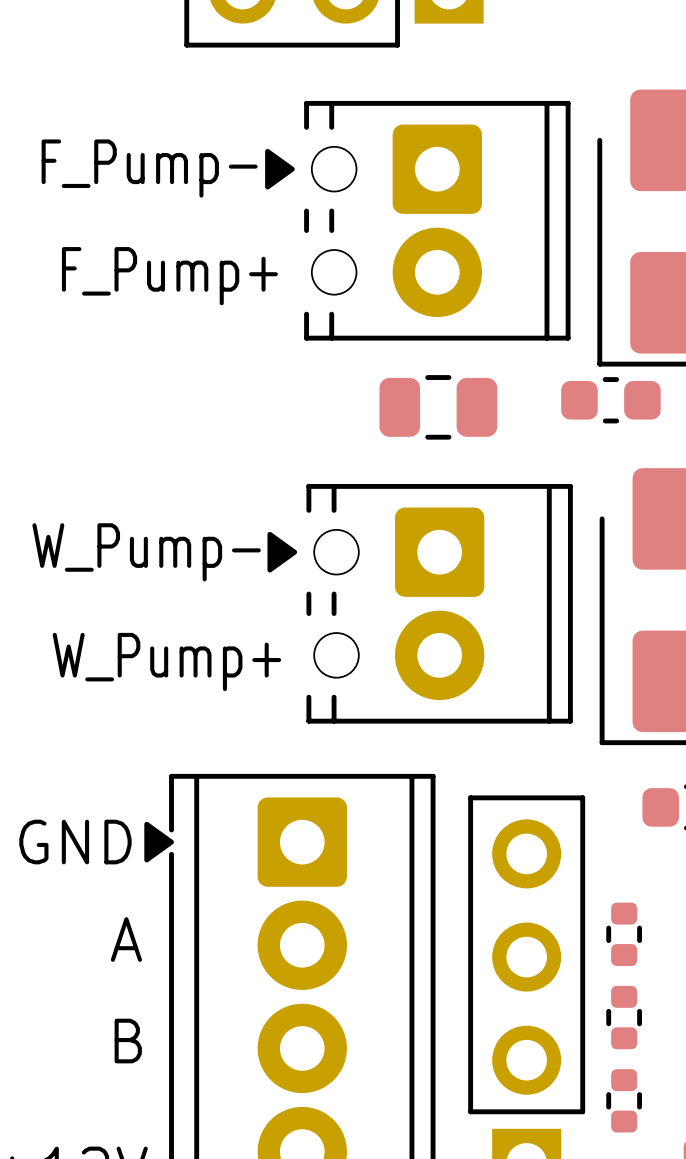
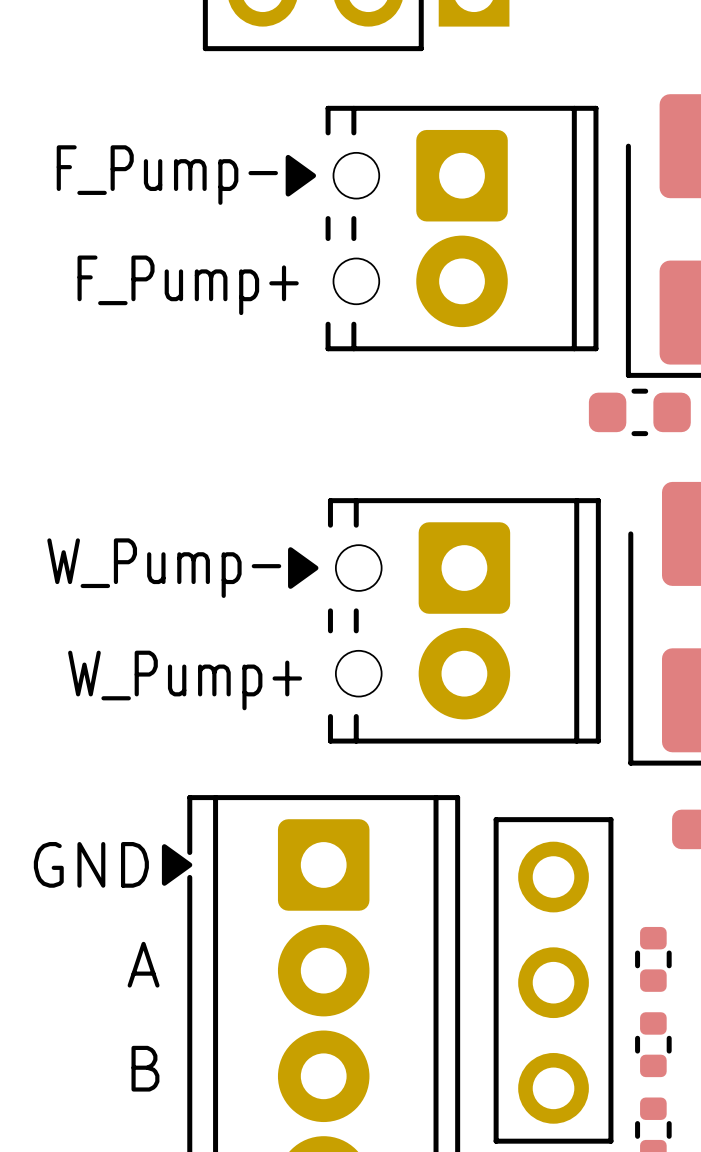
part: (438, 407) -> none

